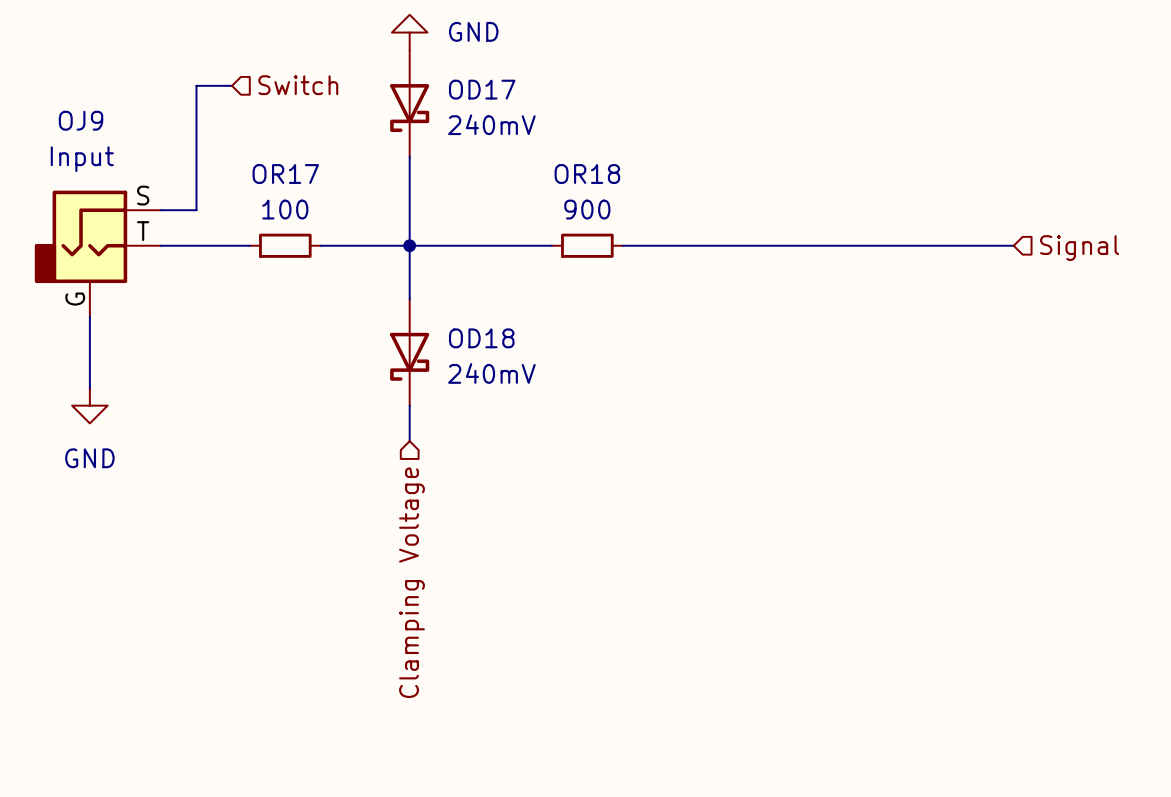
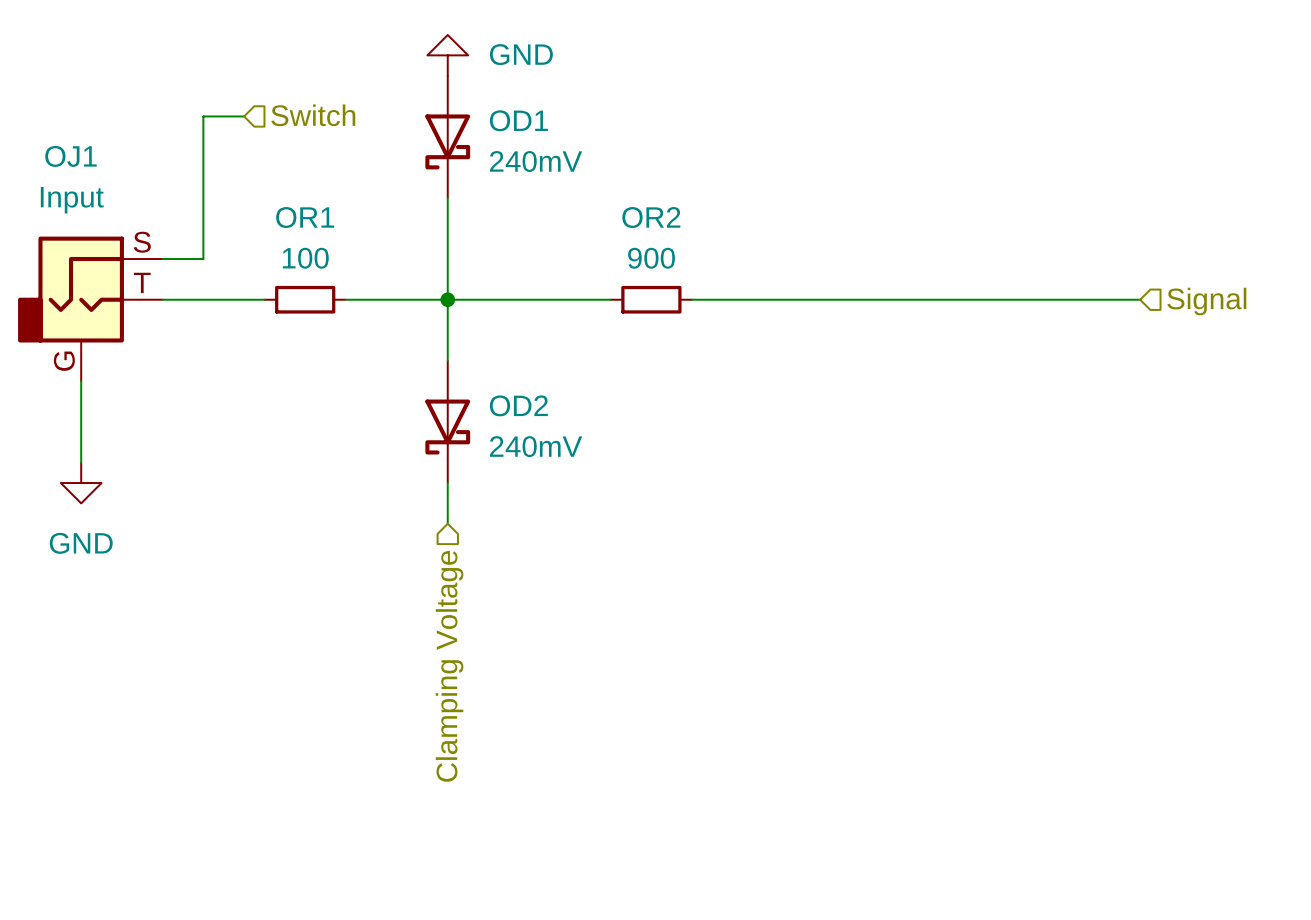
OD17 name: OD17 (482, 89) -> OD1 (518, 120)
OJ9 name: OJ9 (81, 120) -> OJ1 (70, 156)
OR17 name: OR17 (285, 174) -> OR1 (305, 217)
OR18 name: OR18 (587, 174) -> OR2 (651, 217)
OD18 name: OD18 (481, 338) -> OD2 (518, 405)

